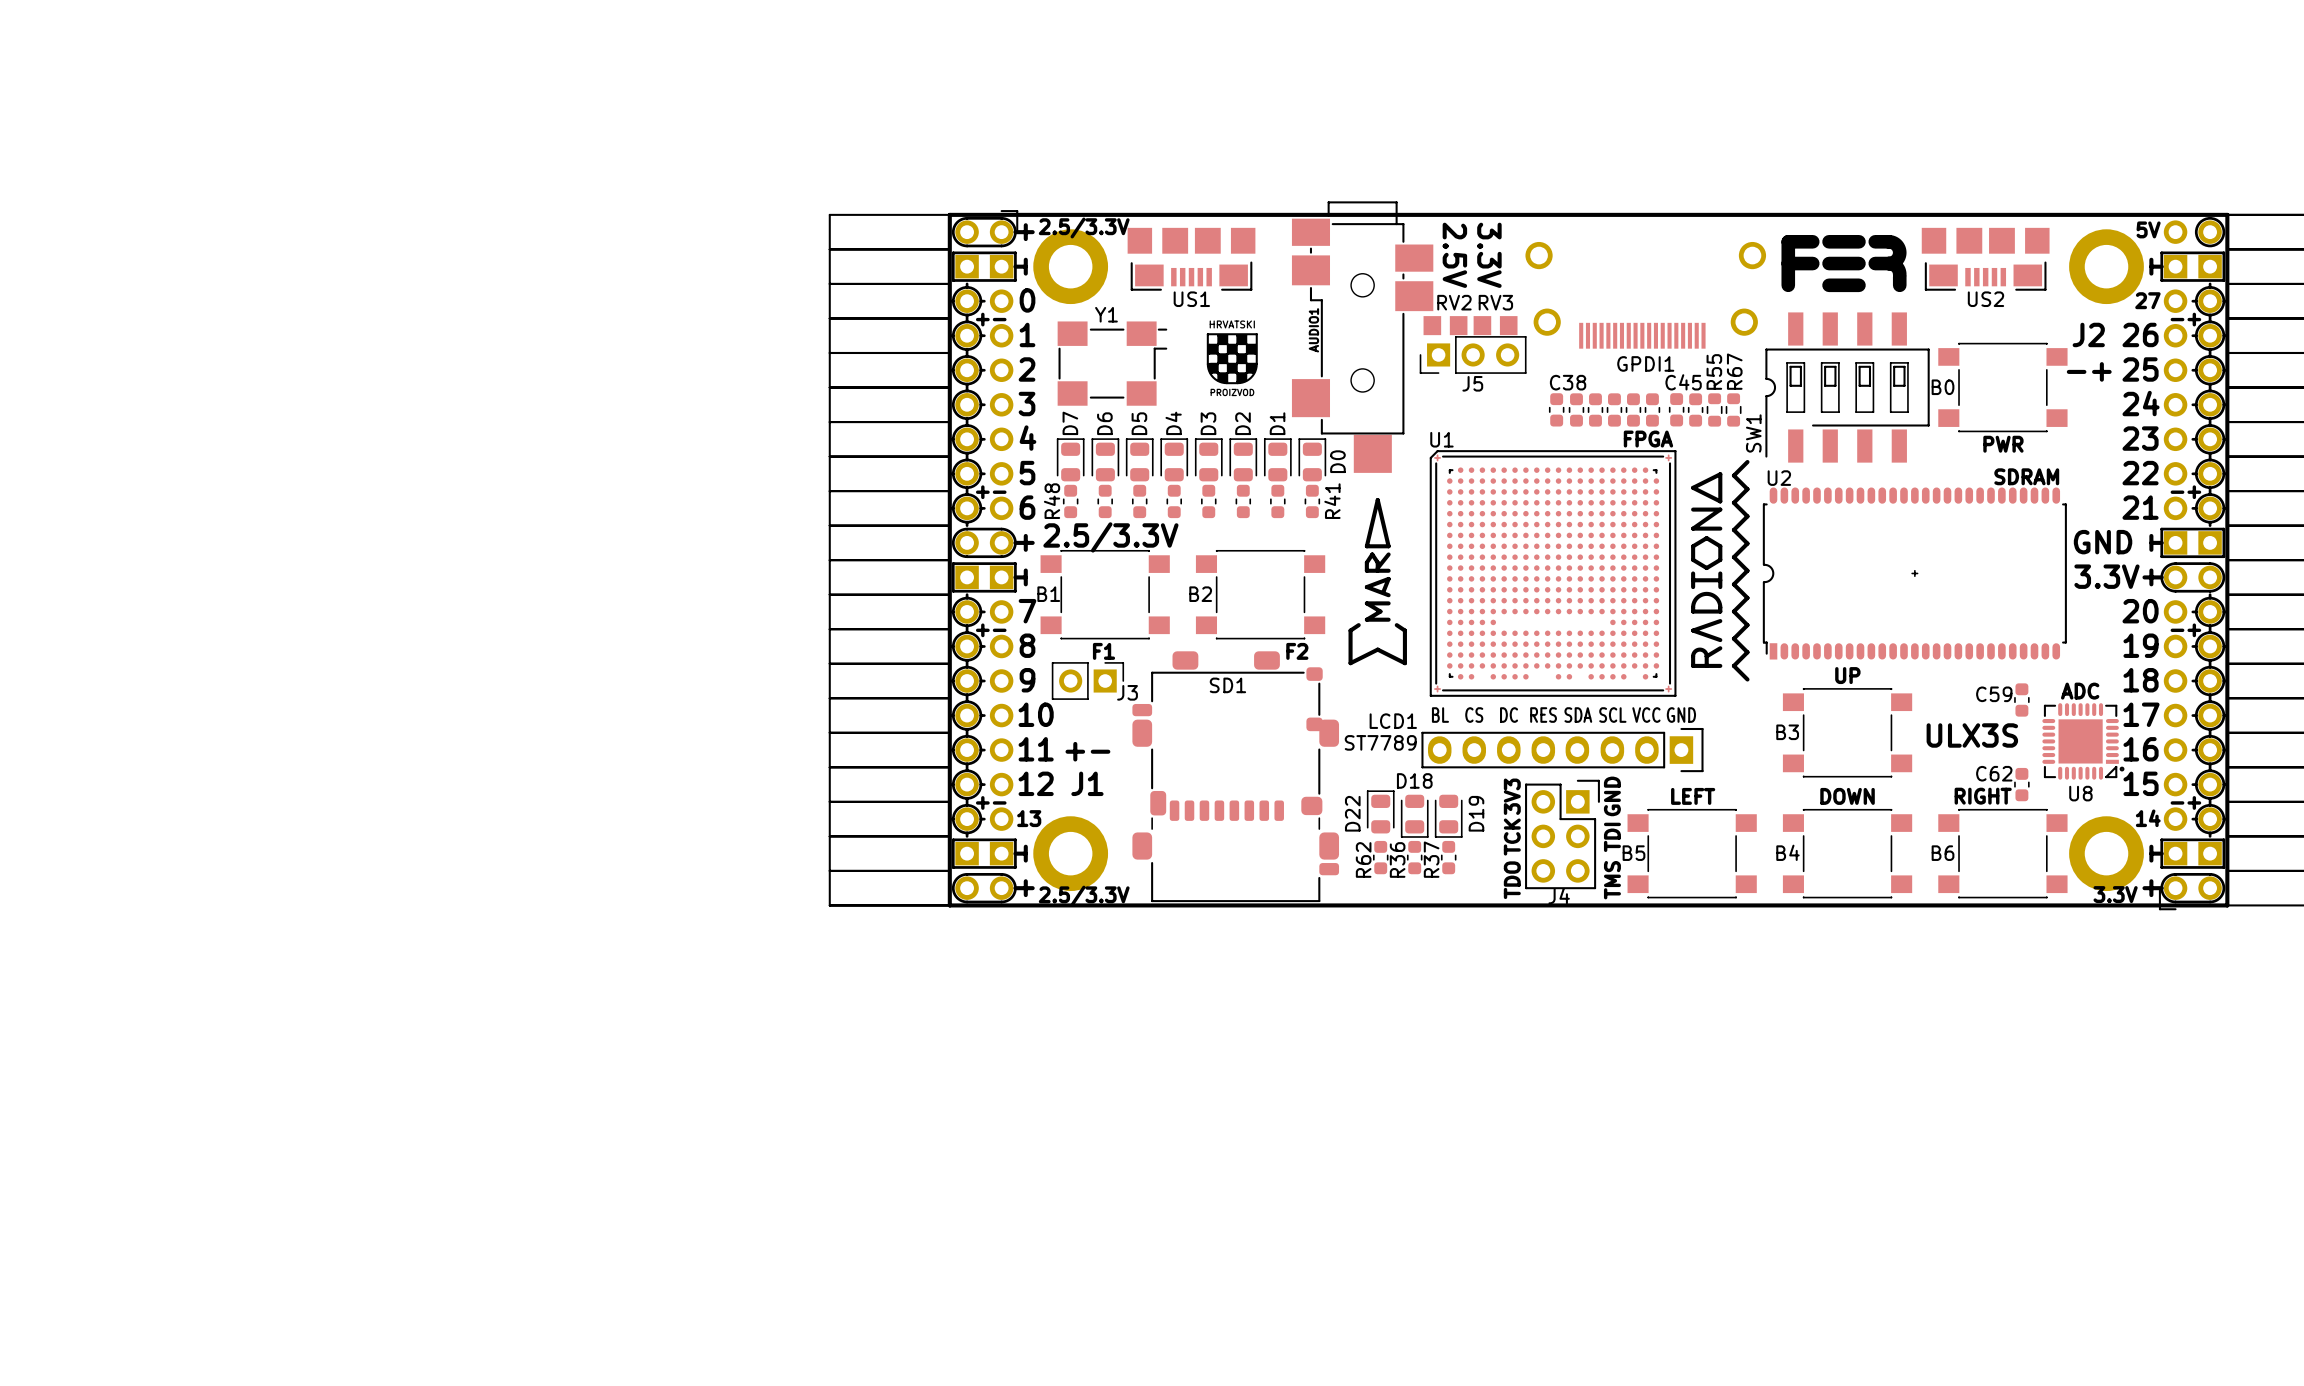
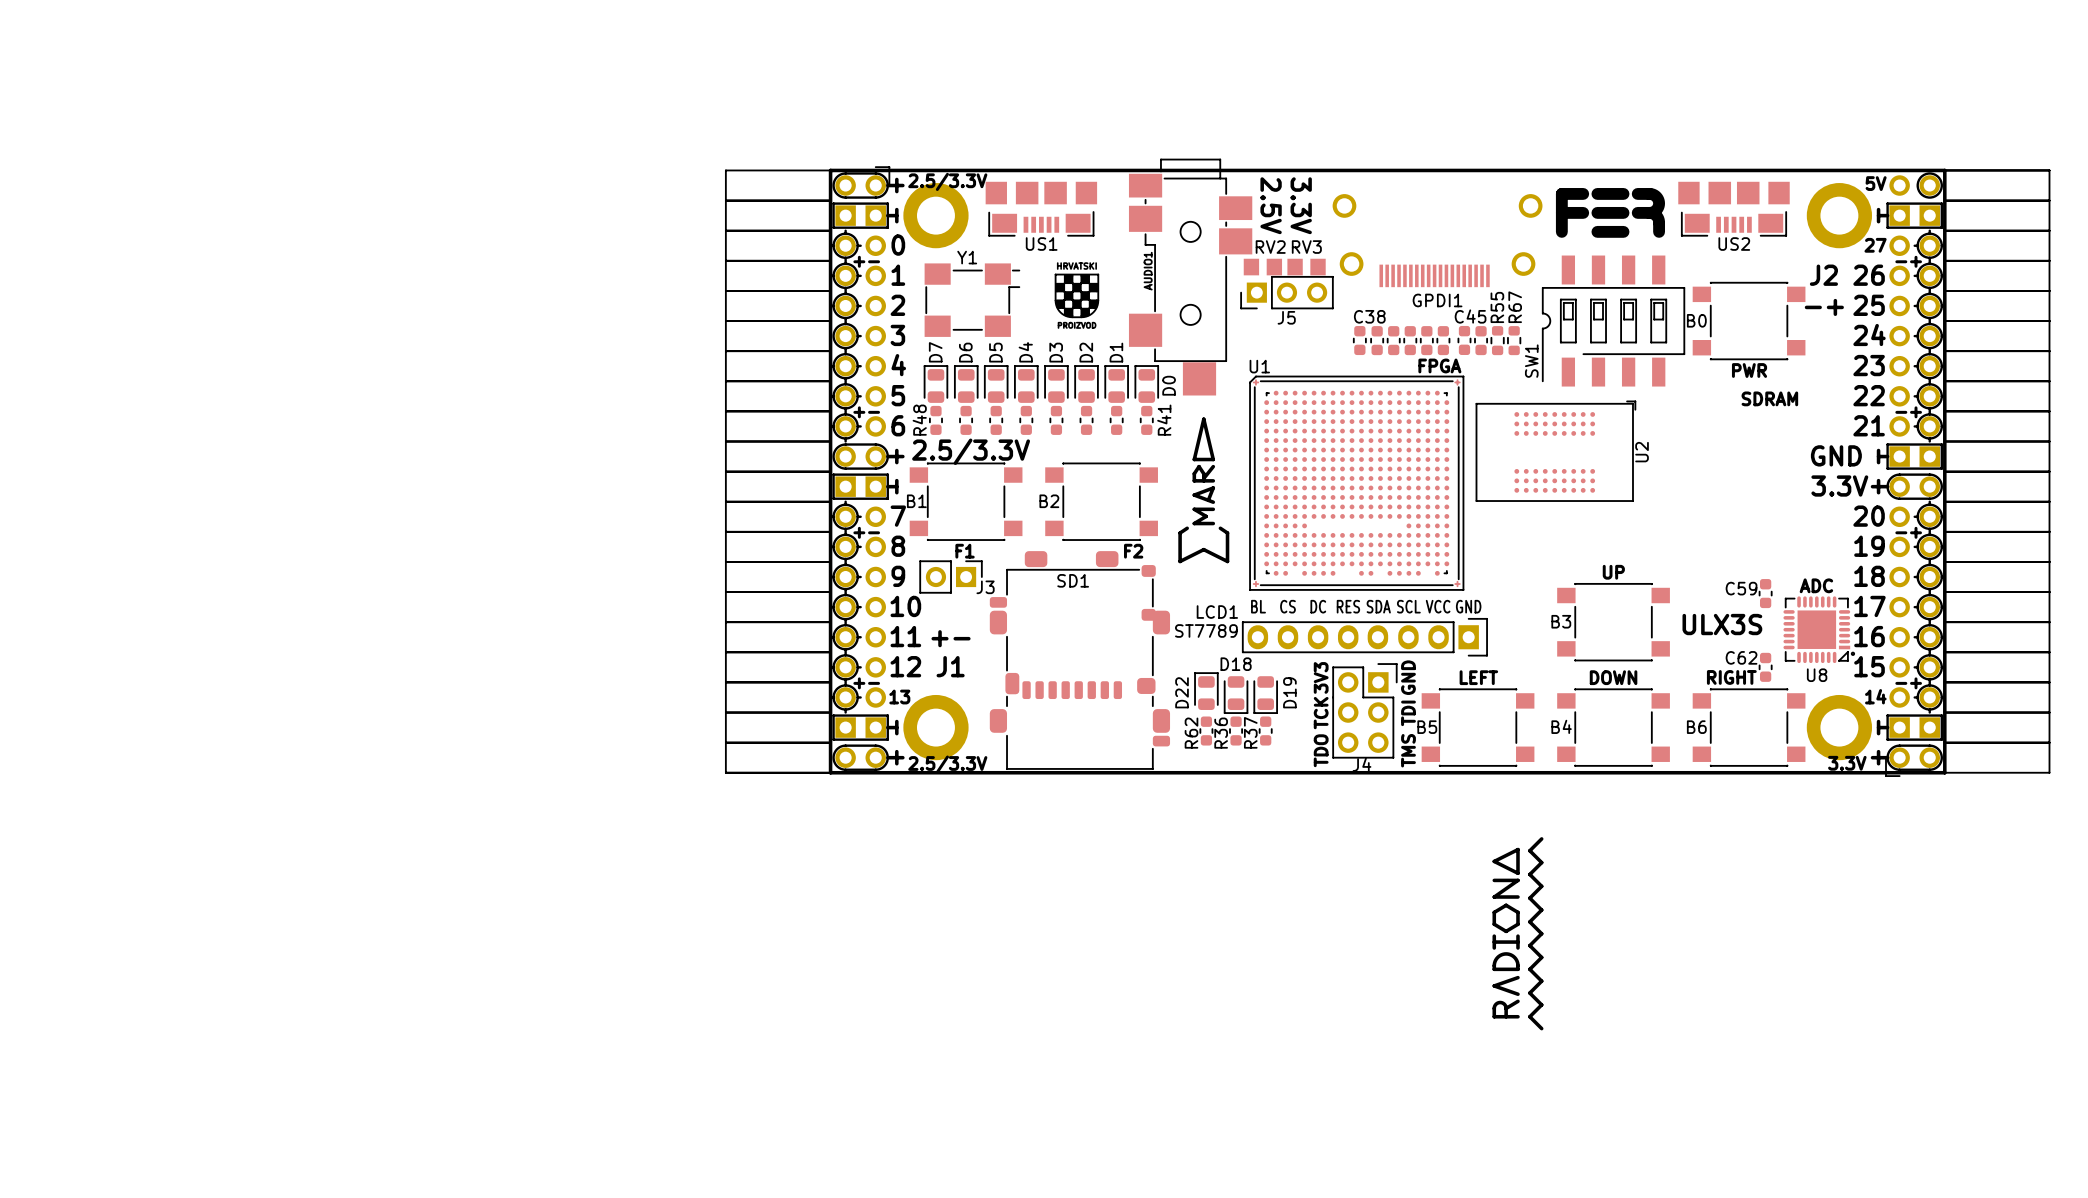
drawing: [1691, 459, 1750, 682] -> none
U2 name position: U2 (1779, 478) -> U2 (1642, 452)
U2 footprint: [1762, 487, 2067, 660] -> [1475, 400, 1637, 502]
drawing: none -> [1492, 837, 1544, 1031]

